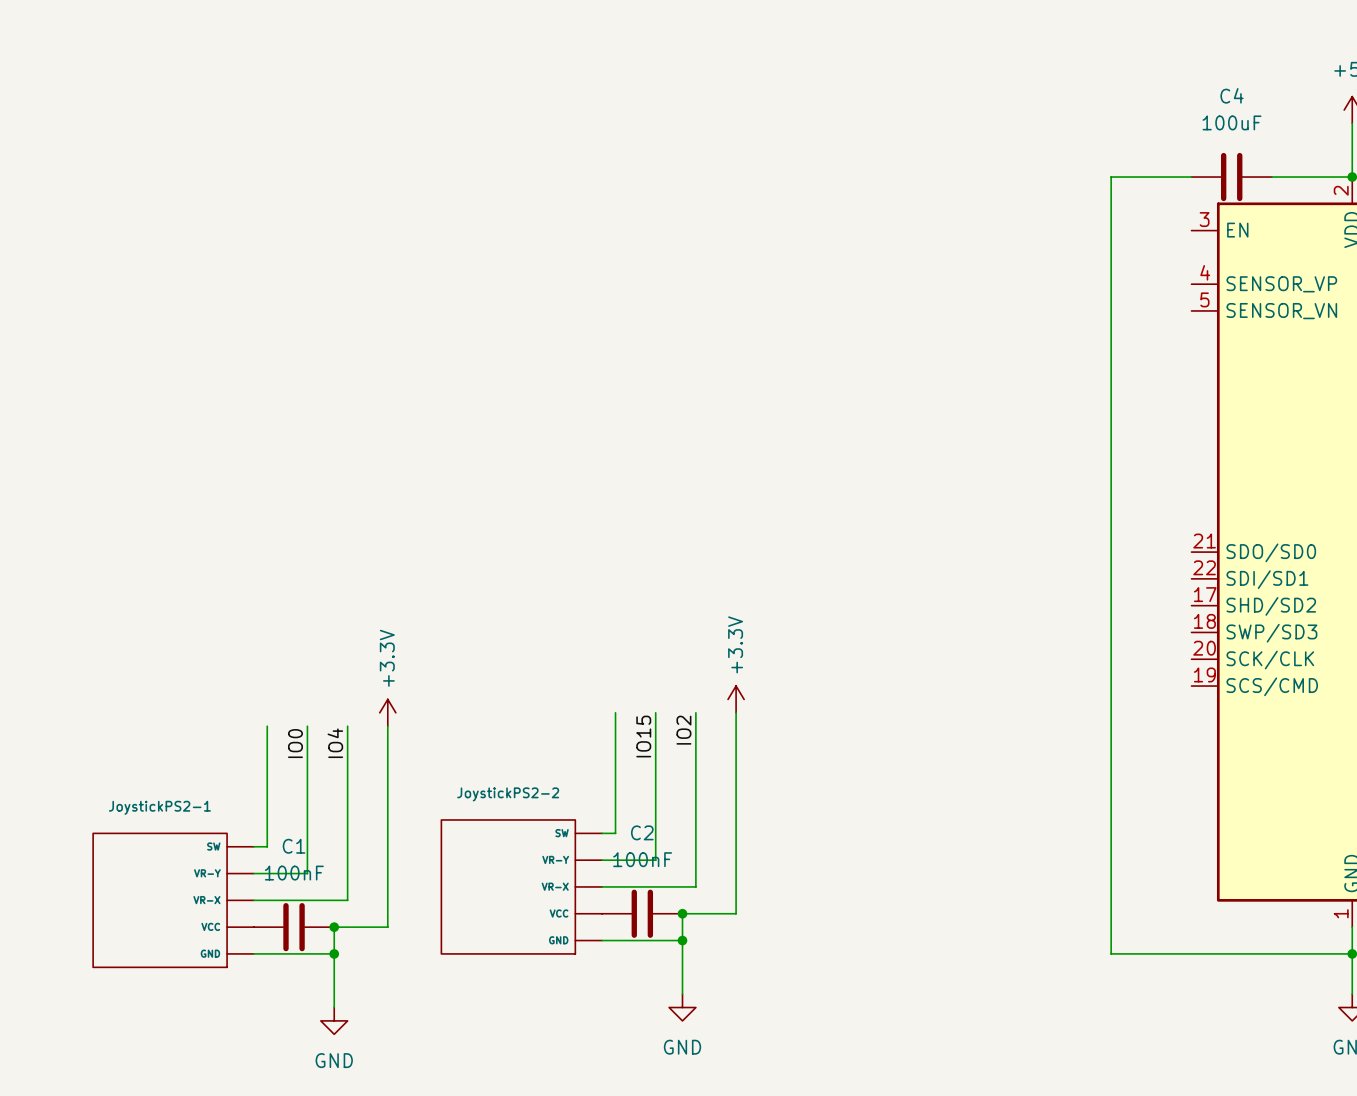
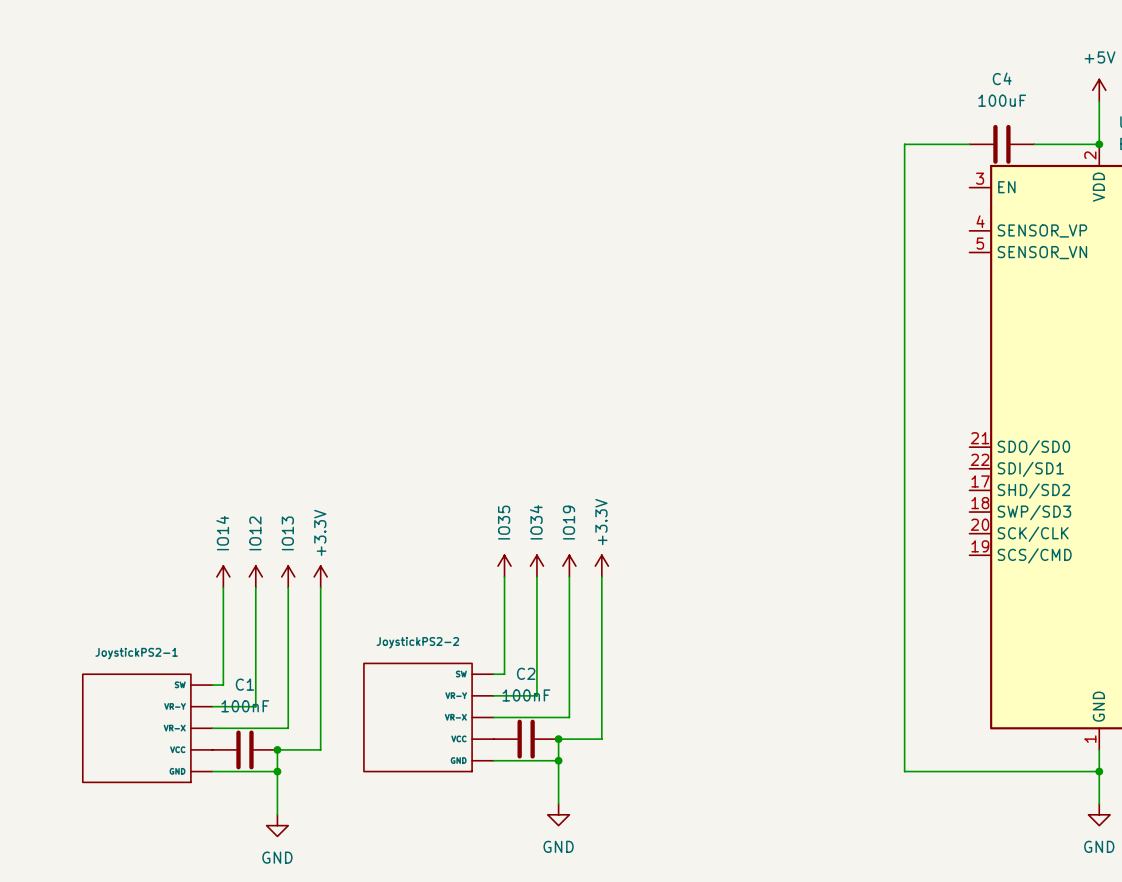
power symbol: none -> IO35 (504, 566)
power symbol: none -> IO34 (536, 566)
power symbol: none -> IO19 (569, 566)
power symbol: none -> IO14 (223, 576)
power symbol: none -> IO12 (255, 576)
power symbol: none -> IO13 (288, 576)
label: IO2 (683, 730) -> none
label: IO15 (643, 736) -> none
label: IO0 (295, 743) -> none
label: IO4 (335, 743) -> none

